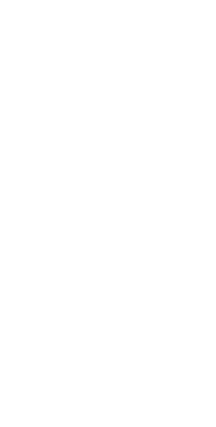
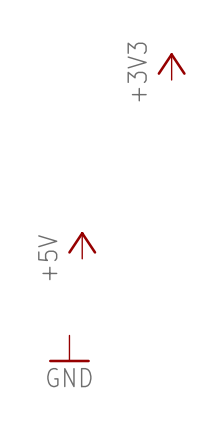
power symbol: none -> +3V3 (171, 66)
power symbol: none -> +5V (82, 245)
power symbol: none -> GND (69, 348)

